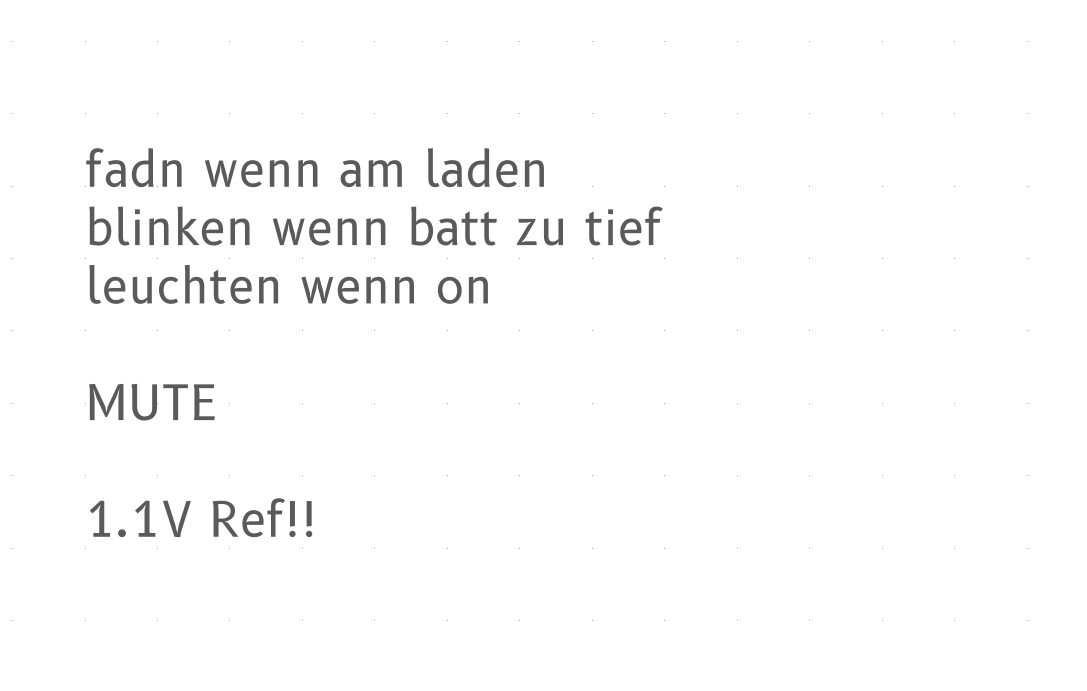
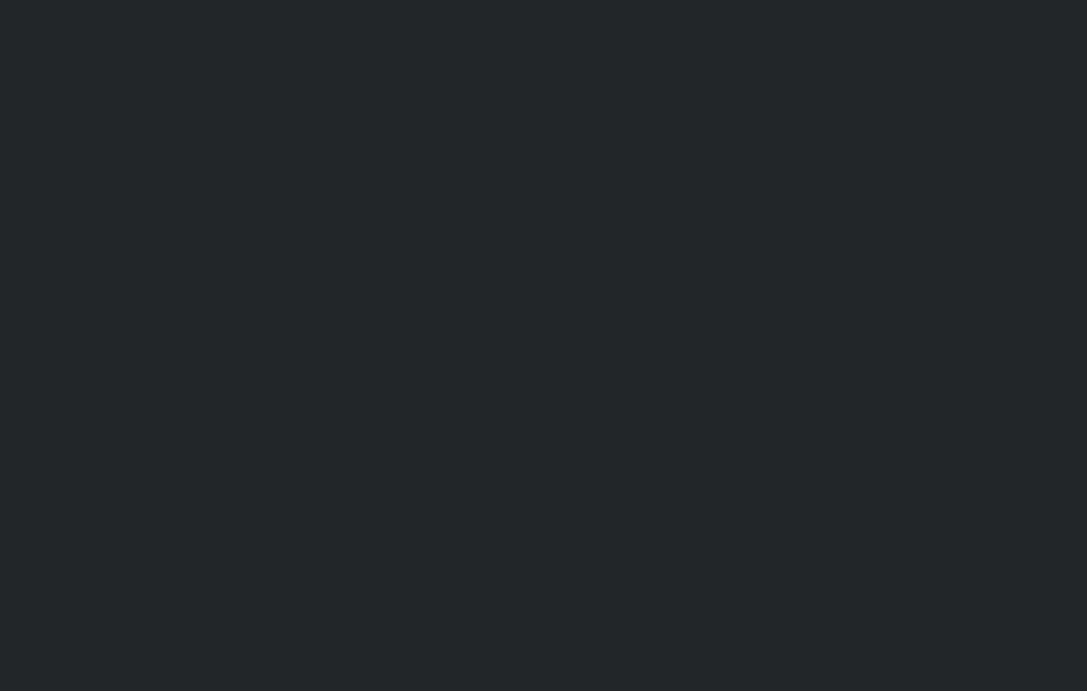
text: fadn wenn am laden (315, 167) -> none
text: blinken wenn batt zu tief (376, 225) -> none
text: leuchten wenn on (288, 284) -> none
text: MUTE (152, 402) -> none
text: 1.1V Ref!! (201, 517) -> none

